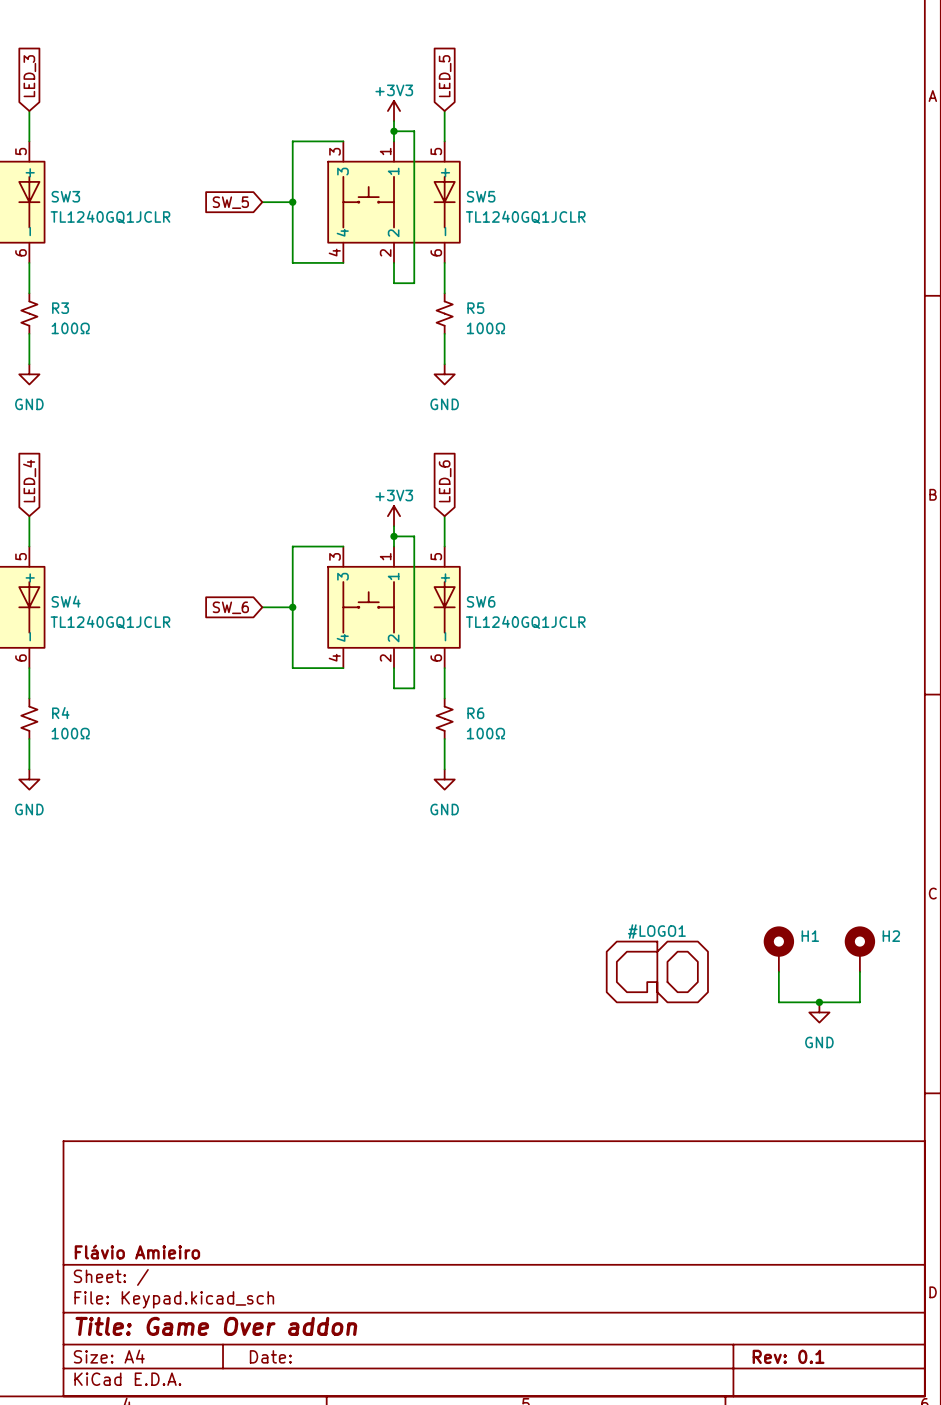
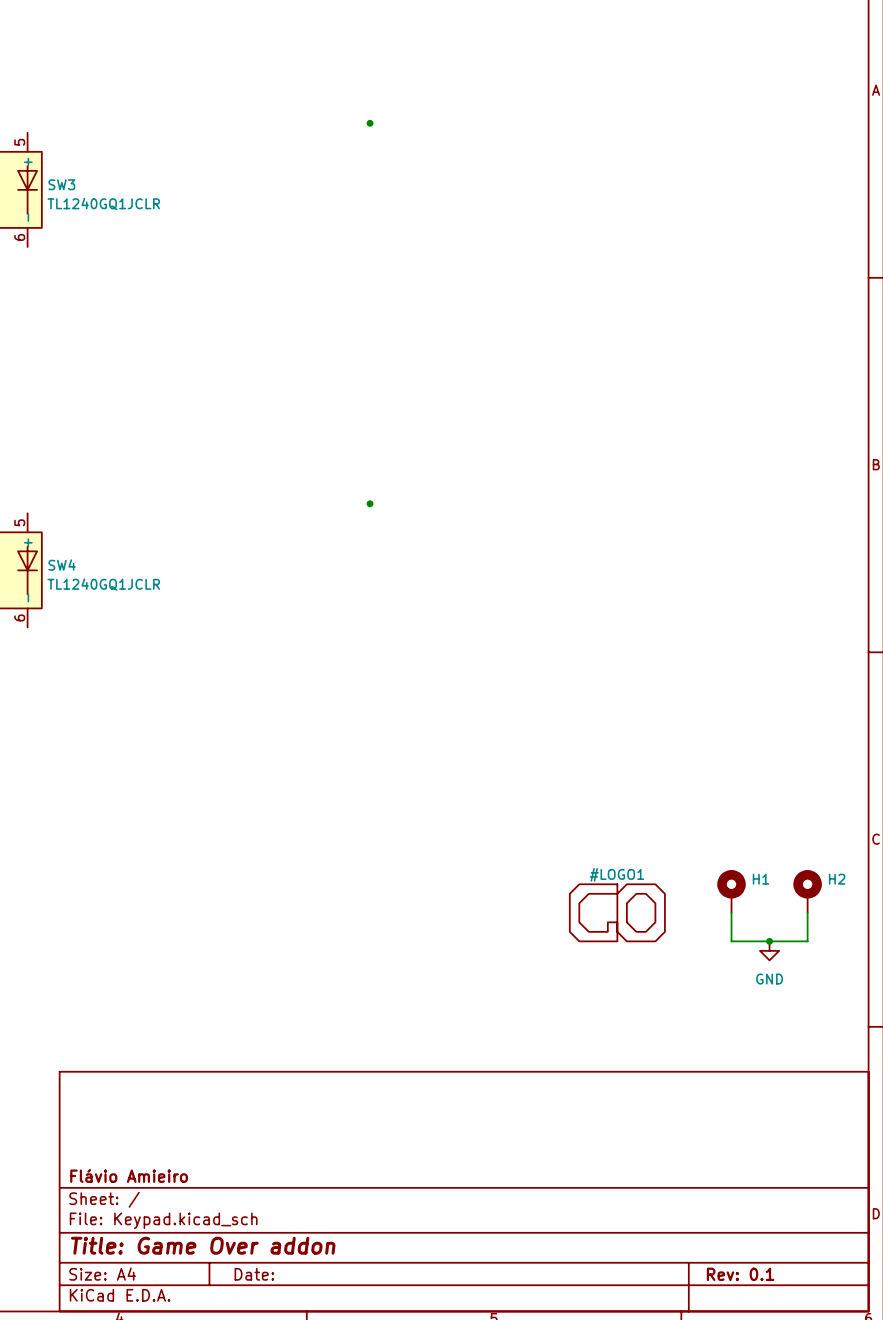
global label: LED_3 (29, 76) -> none
global label: LED_5 (445, 76) -> none
wire: (29, 111) (29, 141) -> none
power symbol: +3V3 (394, 111) -> none
wire: (444, 111) (444, 141) -> none
wire: (394, 121) (394, 141) -> none
wire: (394, 131) (414, 131) (414, 283) (394, 283) (394, 262) -> none
wire: (343, 141) (292, 141) (292, 262) (343, 262) -> none
global label: SW_5 (230, 202) -> none
wire: (262, 202) (292, 202) -> none
junction: (292, 202) -> none
SW5: TL1240GQ1JCLR (394, 202) -> none
wire: (29, 262) (29, 293) -> none
wire: (444, 262) (444, 293) -> none
R3: 100Ω (29, 313) -> none
R5: 100Ω (444, 313) -> none
wire: (29, 333) (29, 364) -> none
wire: (444, 333) (444, 364) -> none
power symbol: GND (29, 374) -> none
power symbol: GND (444, 374) -> none
global label: LED_4 (29, 481) -> none
global label: LED_6 (445, 481) -> none
wire: (29, 516) (29, 546) -> none
power symbol: +3V3 (394, 516) -> none
wire: (444, 516) (444, 546) -> none
wire: (394, 526) (394, 546) -> none
wire: (394, 536) (414, 536) (414, 688) (394, 688) (394, 668) -> none
wire: (343, 546) (292, 546) (292, 668) (343, 668) -> none
global label: SW_6 (230, 607) -> none
wire: (262, 607) (292, 607) -> none
junction: (292, 607) -> none
SW6: TL1240GQ1JCLR (394, 607) -> none
wire: (29, 668) (29, 698) -> none
wire: (444, 668) (444, 698) -> none
R4: 100Ω (29, 718) -> none
R6: 100Ω (444, 718) -> none
wire: (29, 738) (29, 769) -> none
wire: (444, 738) (444, 769) -> none
power symbol: GND (29, 779) -> none
power symbol: GND (444, 779) -> none

